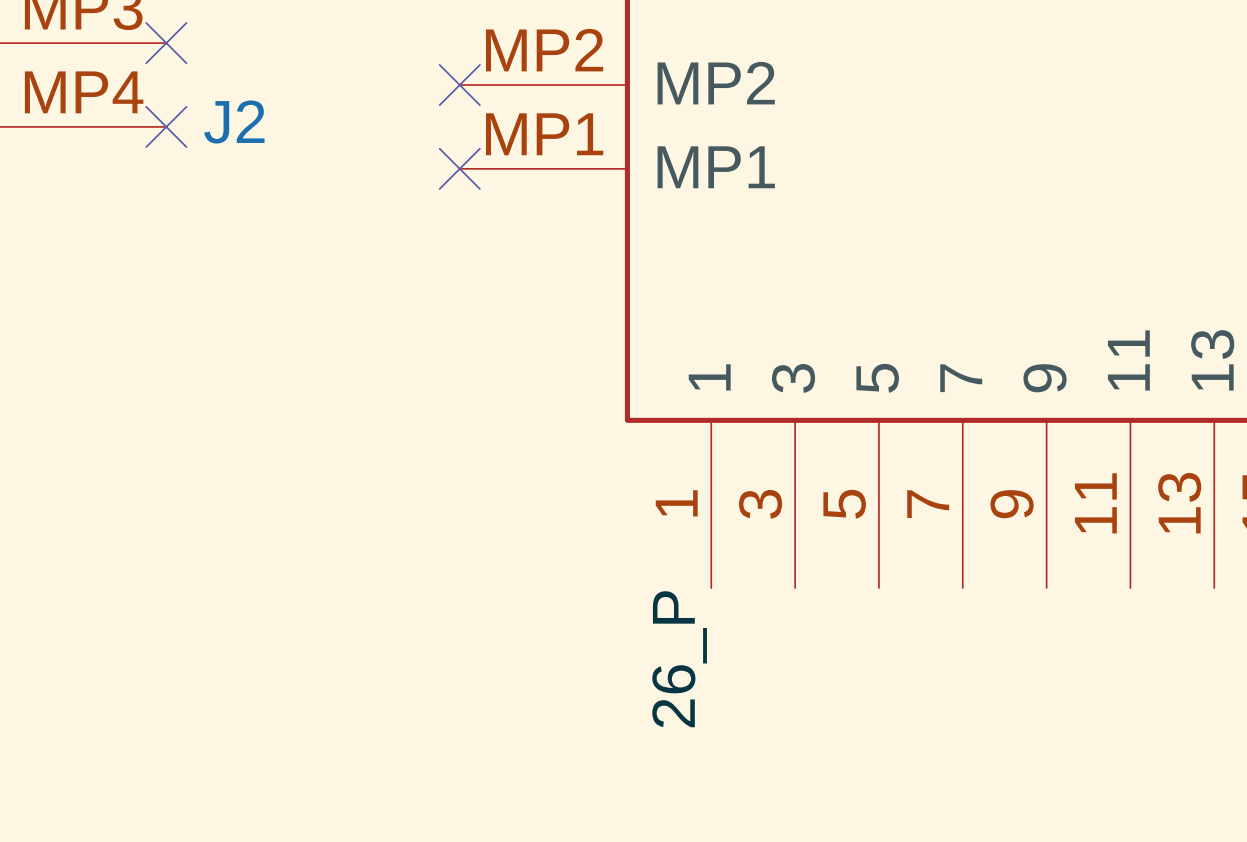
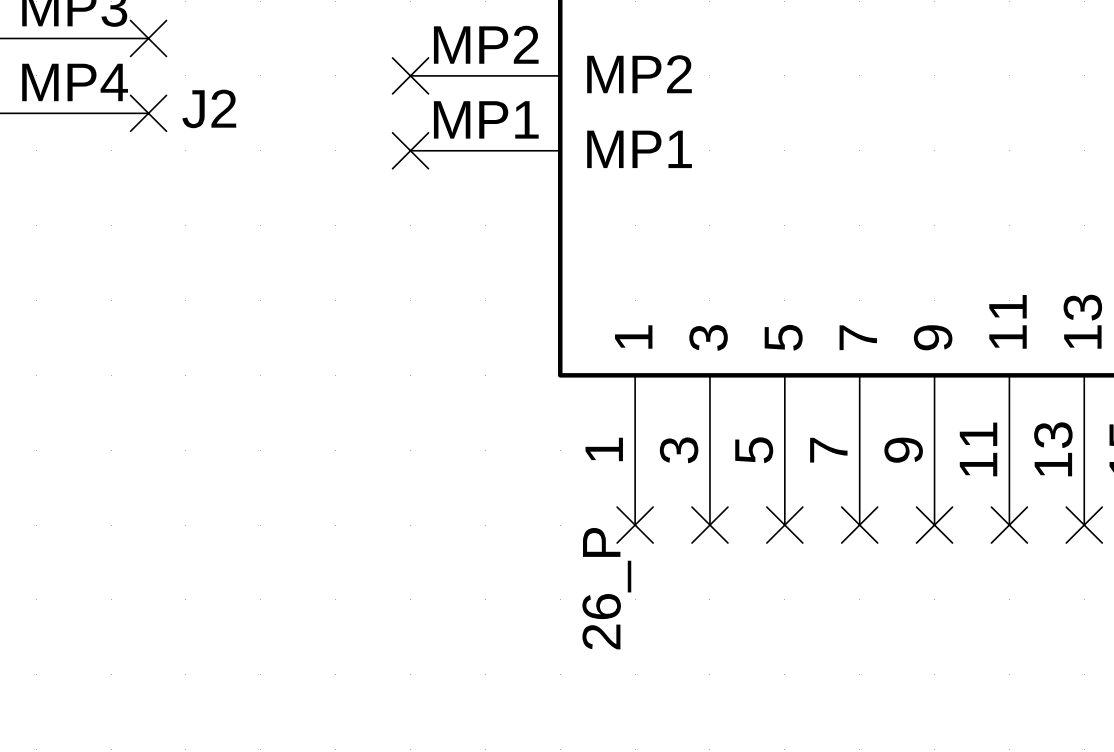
no-connect mark: none -> (635, 525)
no-connect mark: none -> (709, 525)
no-connect mark: none -> (784, 525)
no-connect mark: none -> (859, 525)
no-connect mark: none -> (934, 525)
no-connect mark: none -> (1009, 525)
no-connect mark: none -> (1084, 525)

